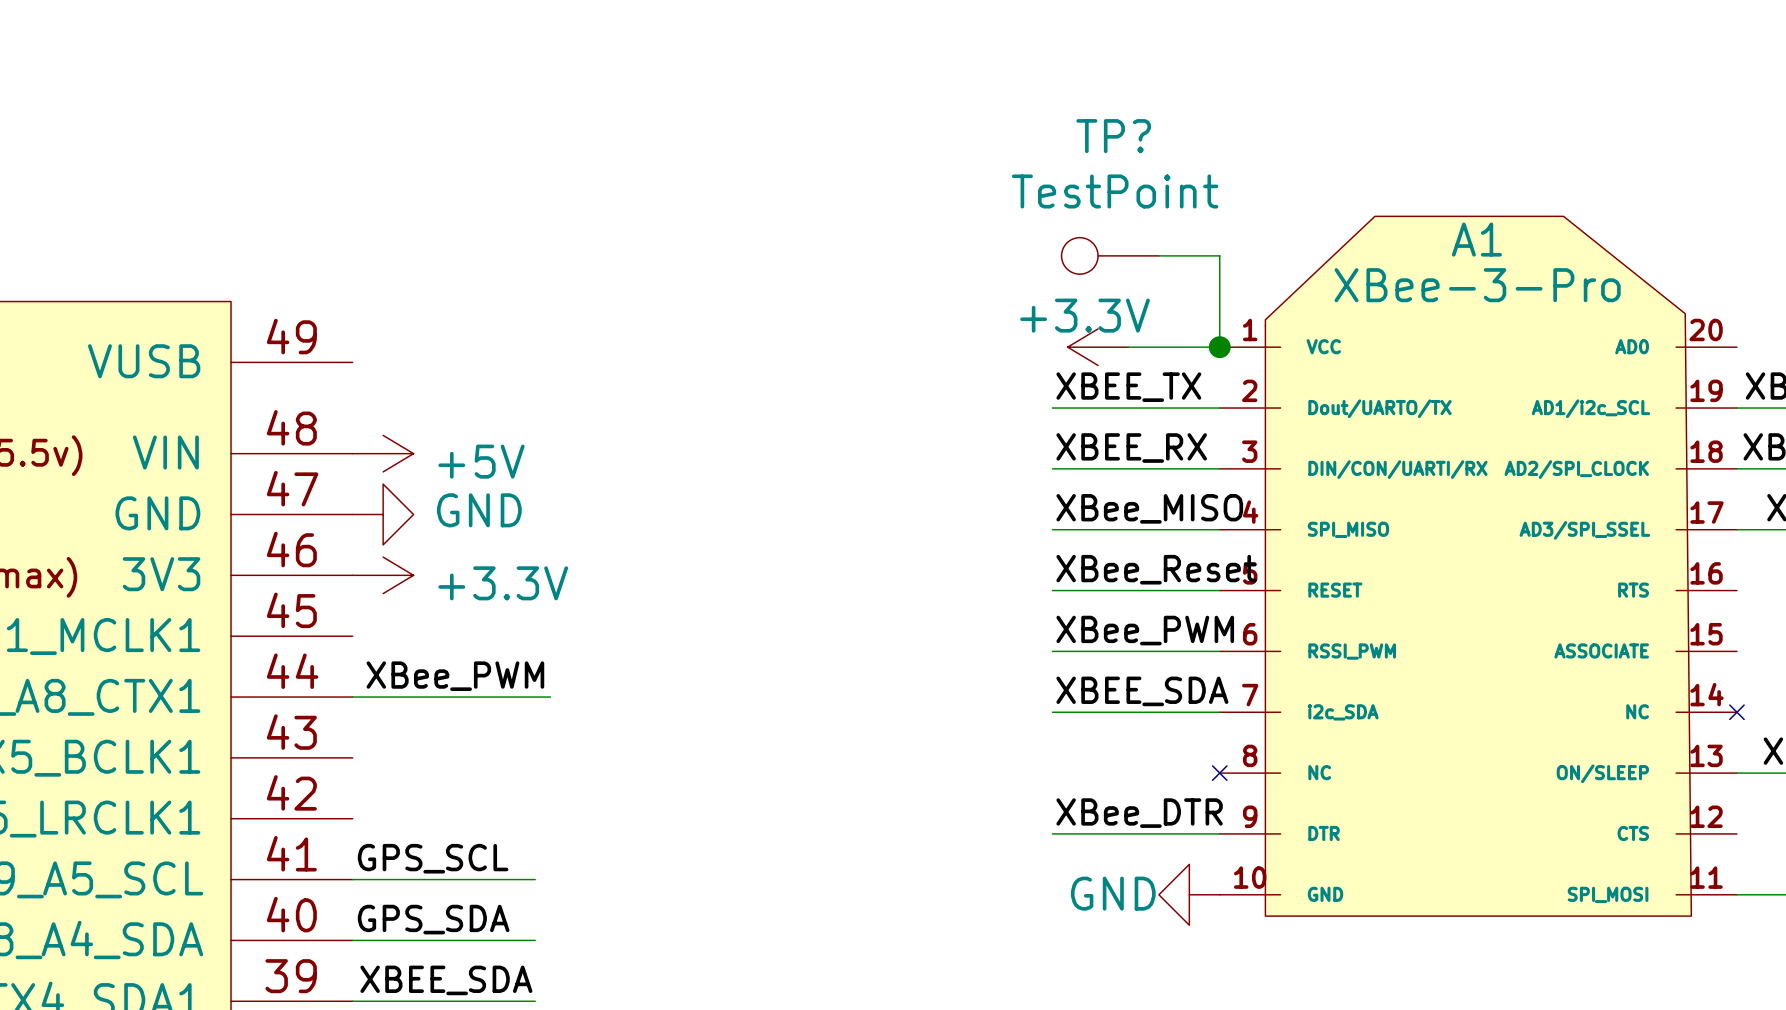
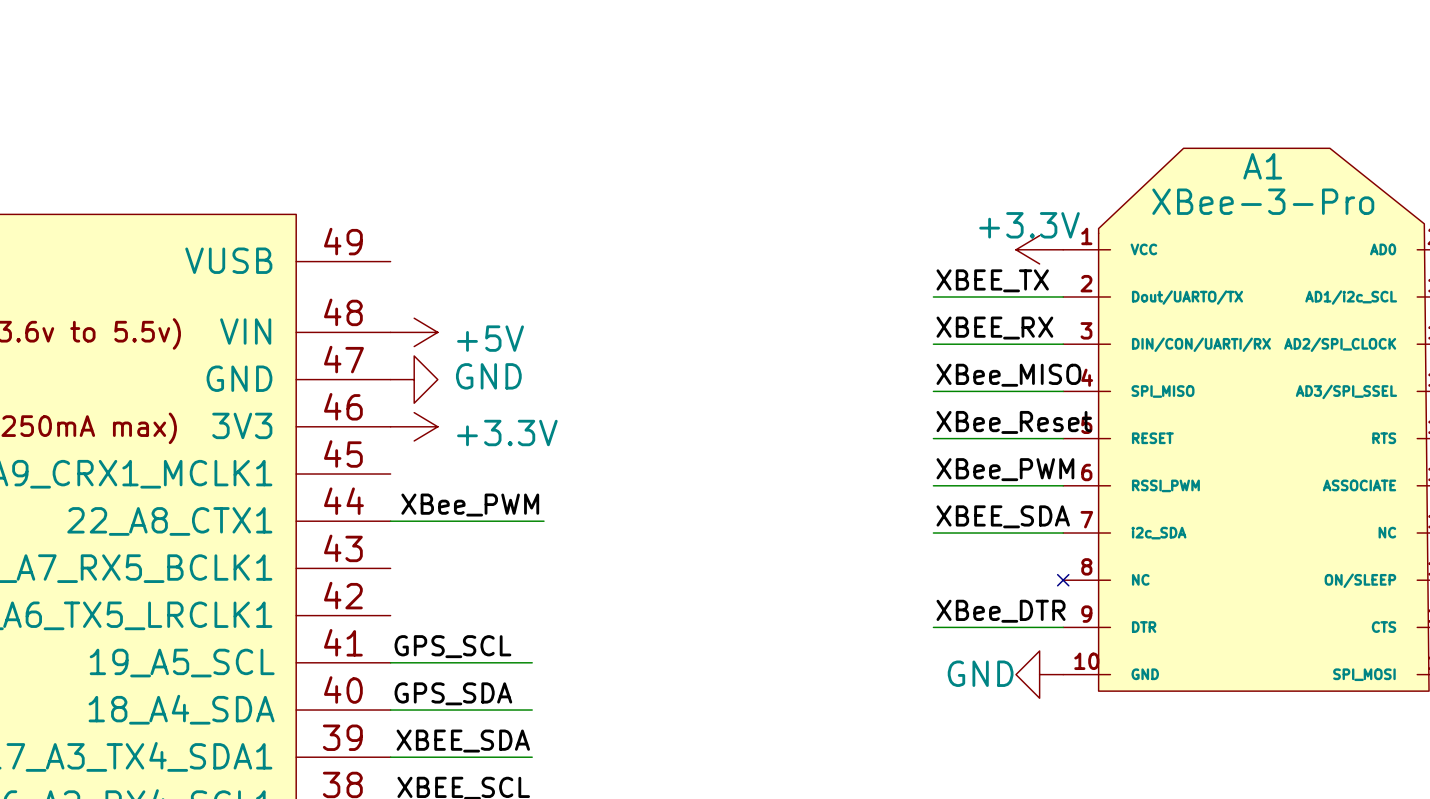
TP?: TestPoint (1110, 255) -> none
wire: (1158, 255) (1219, 255) (1219, 347) (1128, 347) -> none
power symbol position: +3.3V (1098, 347) -> +3.3V (1039, 249)
junction: (1219, 347) -> none

